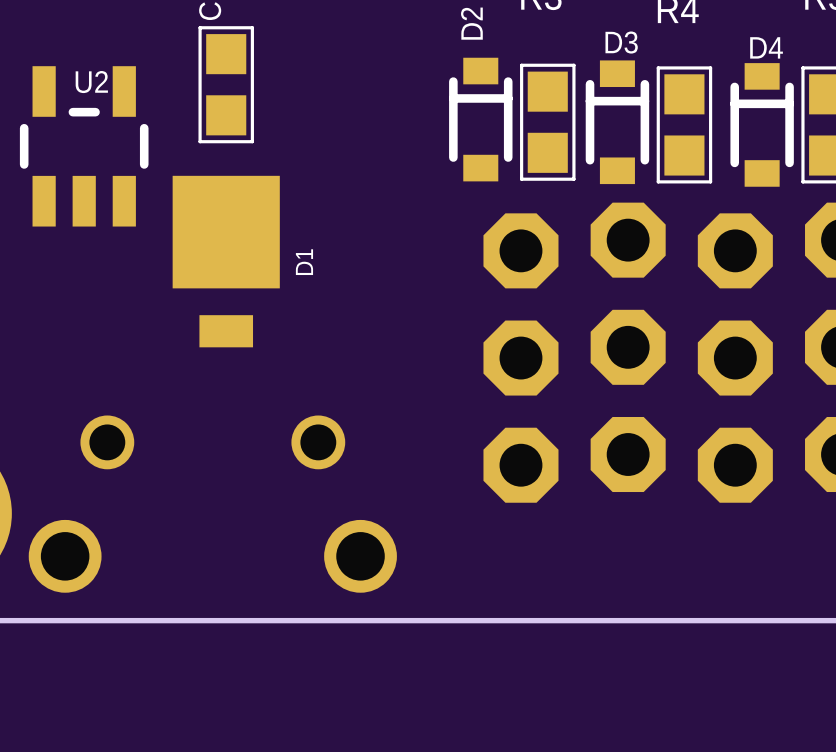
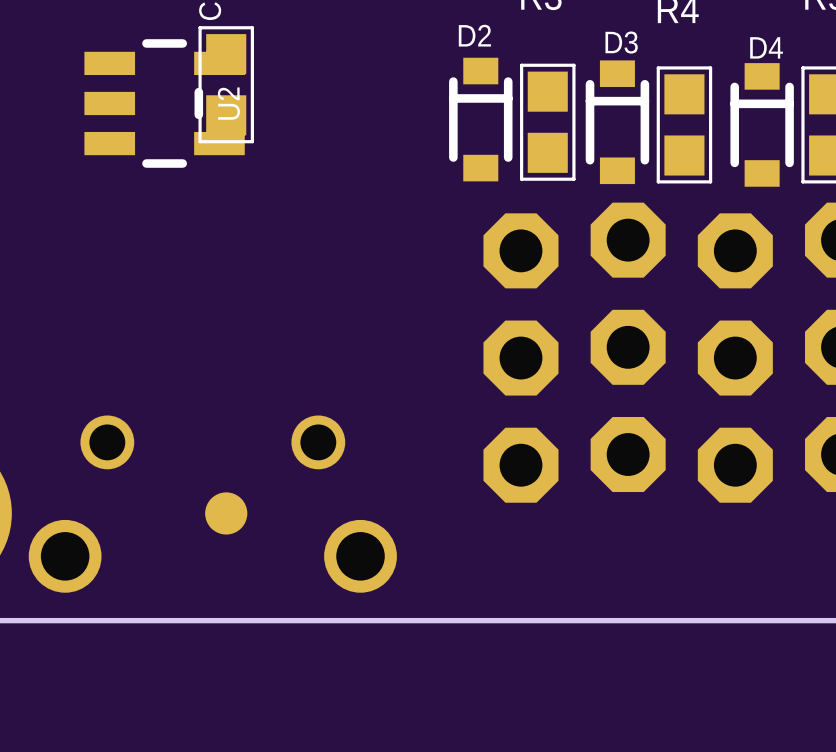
D2 name rotation: 0° (471, 23) -> 90° clockwise (474, 35)
U2 rotation: 0° (84, 146) -> 90° clockwise (164, 103)
D1: (226, 261) -> none
part: none -> (226, 513)

